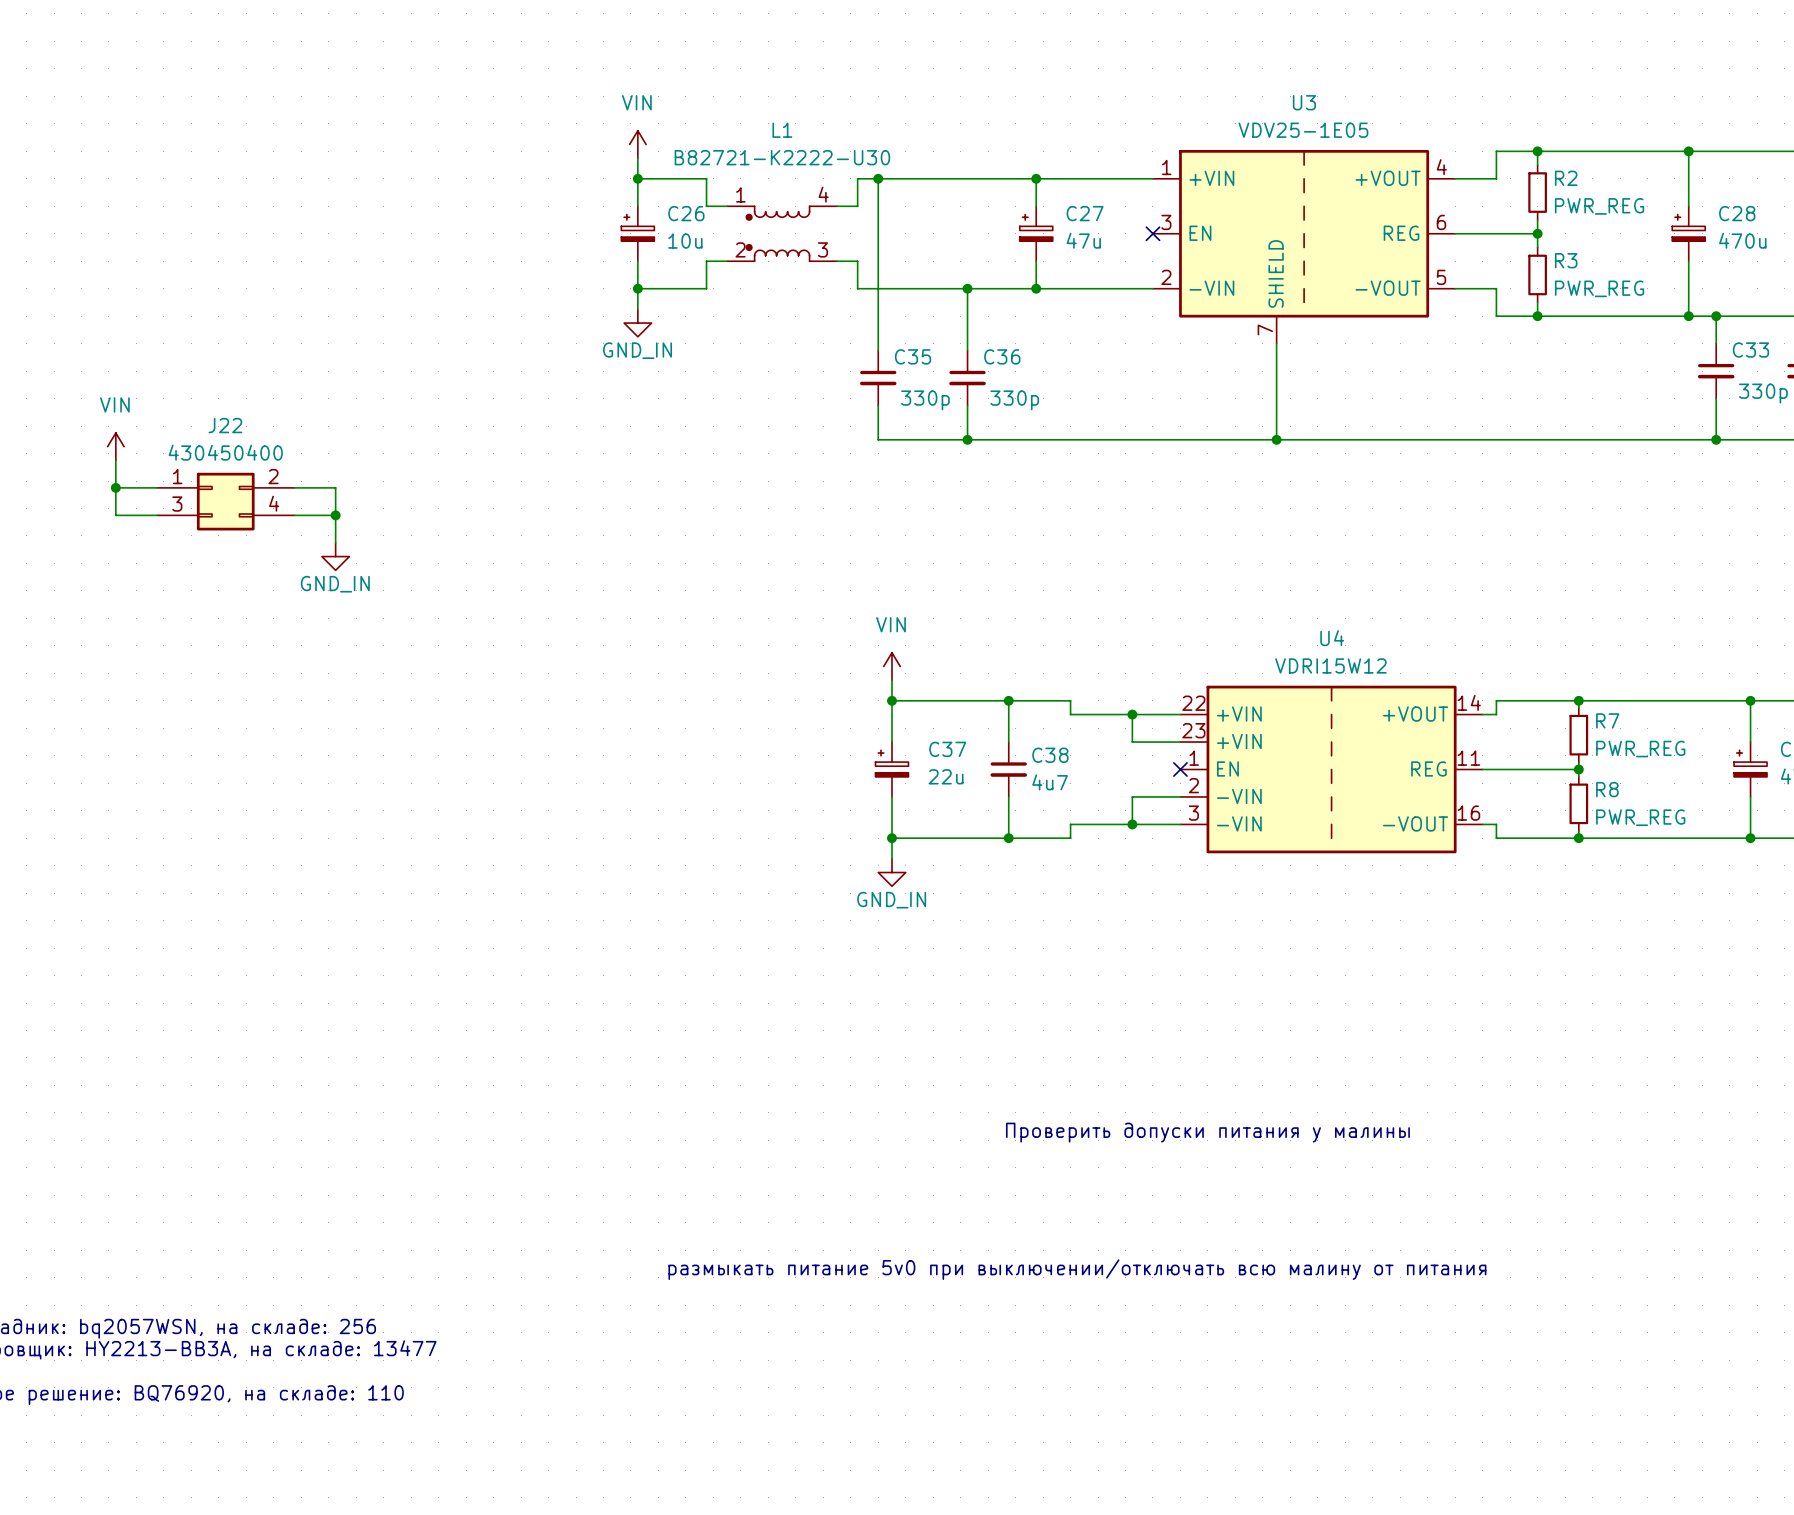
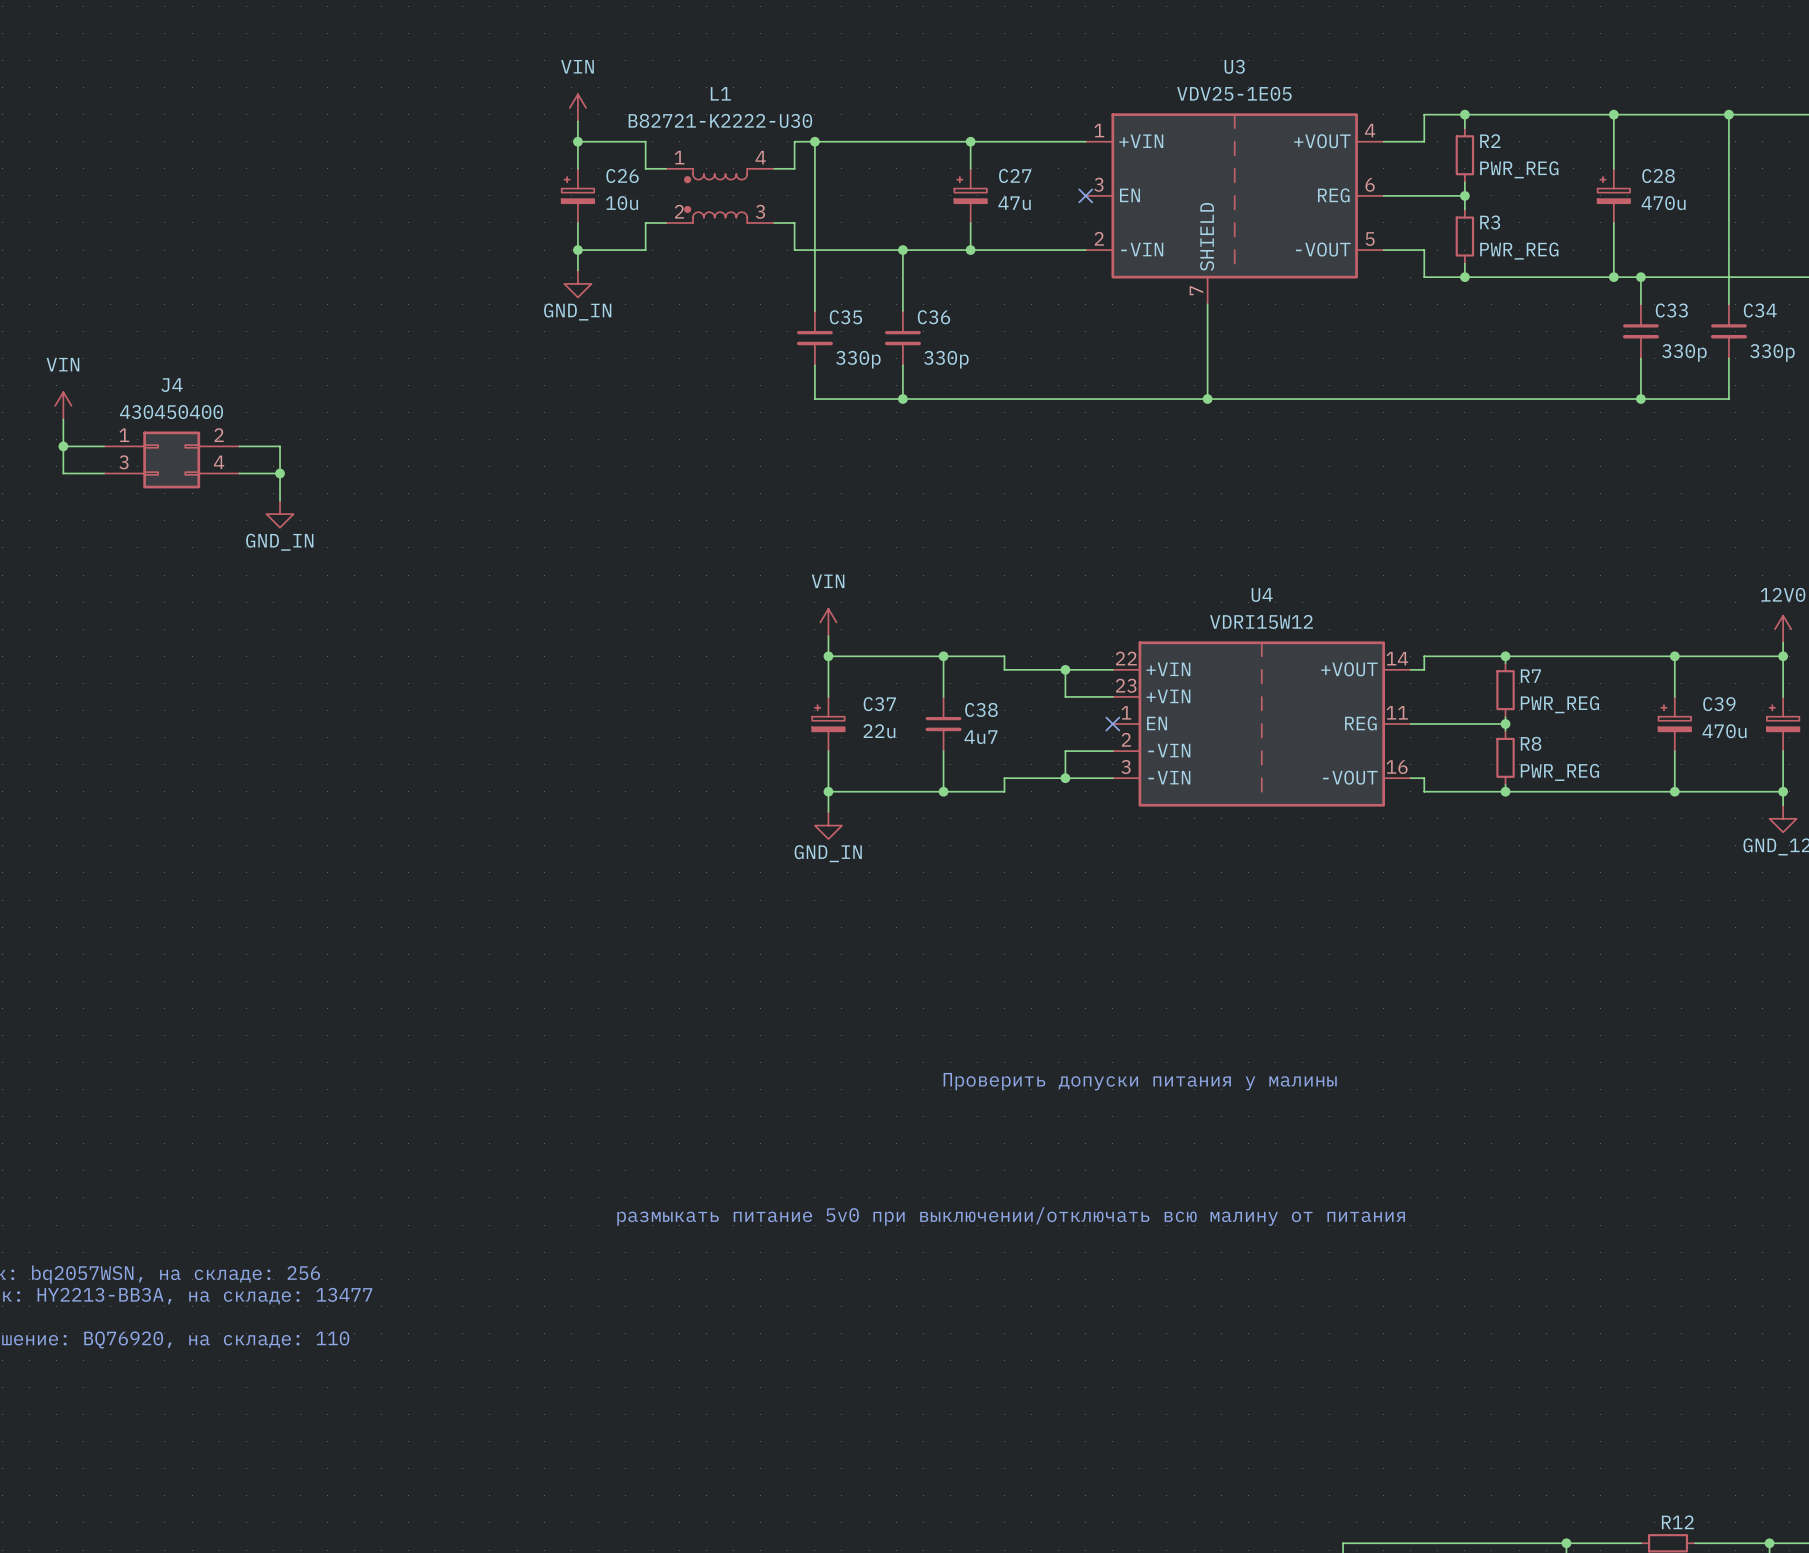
J22 name: J22 (225, 425) -> J4 (172, 385)

